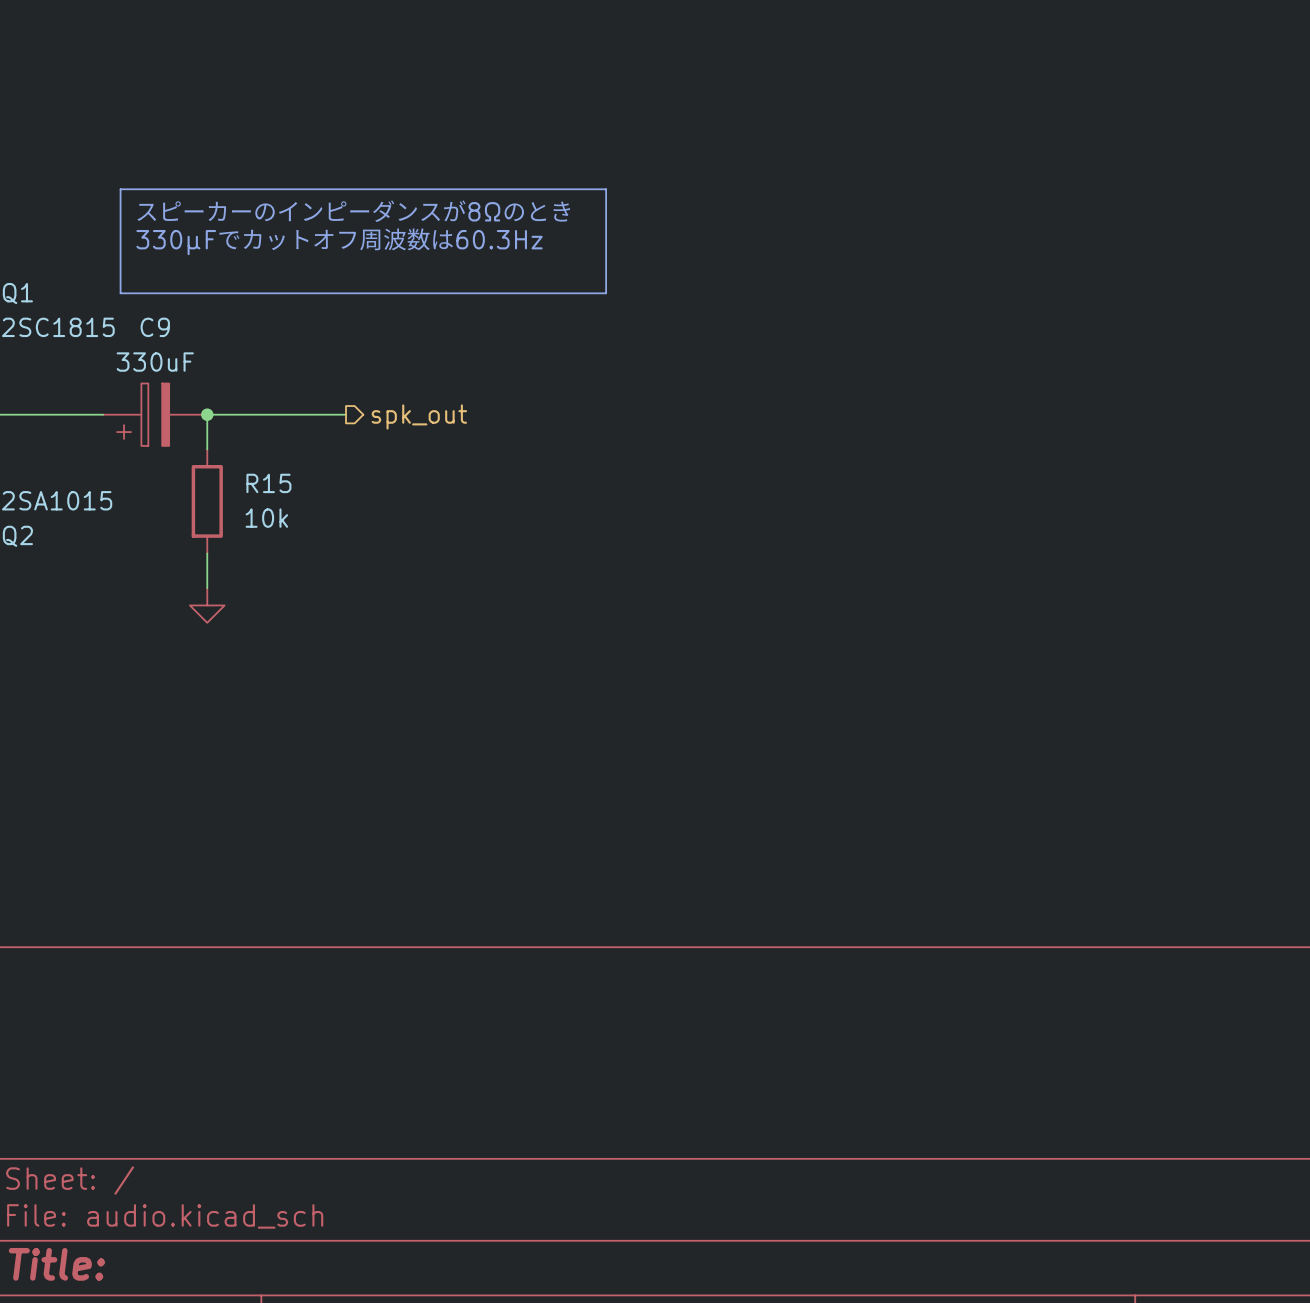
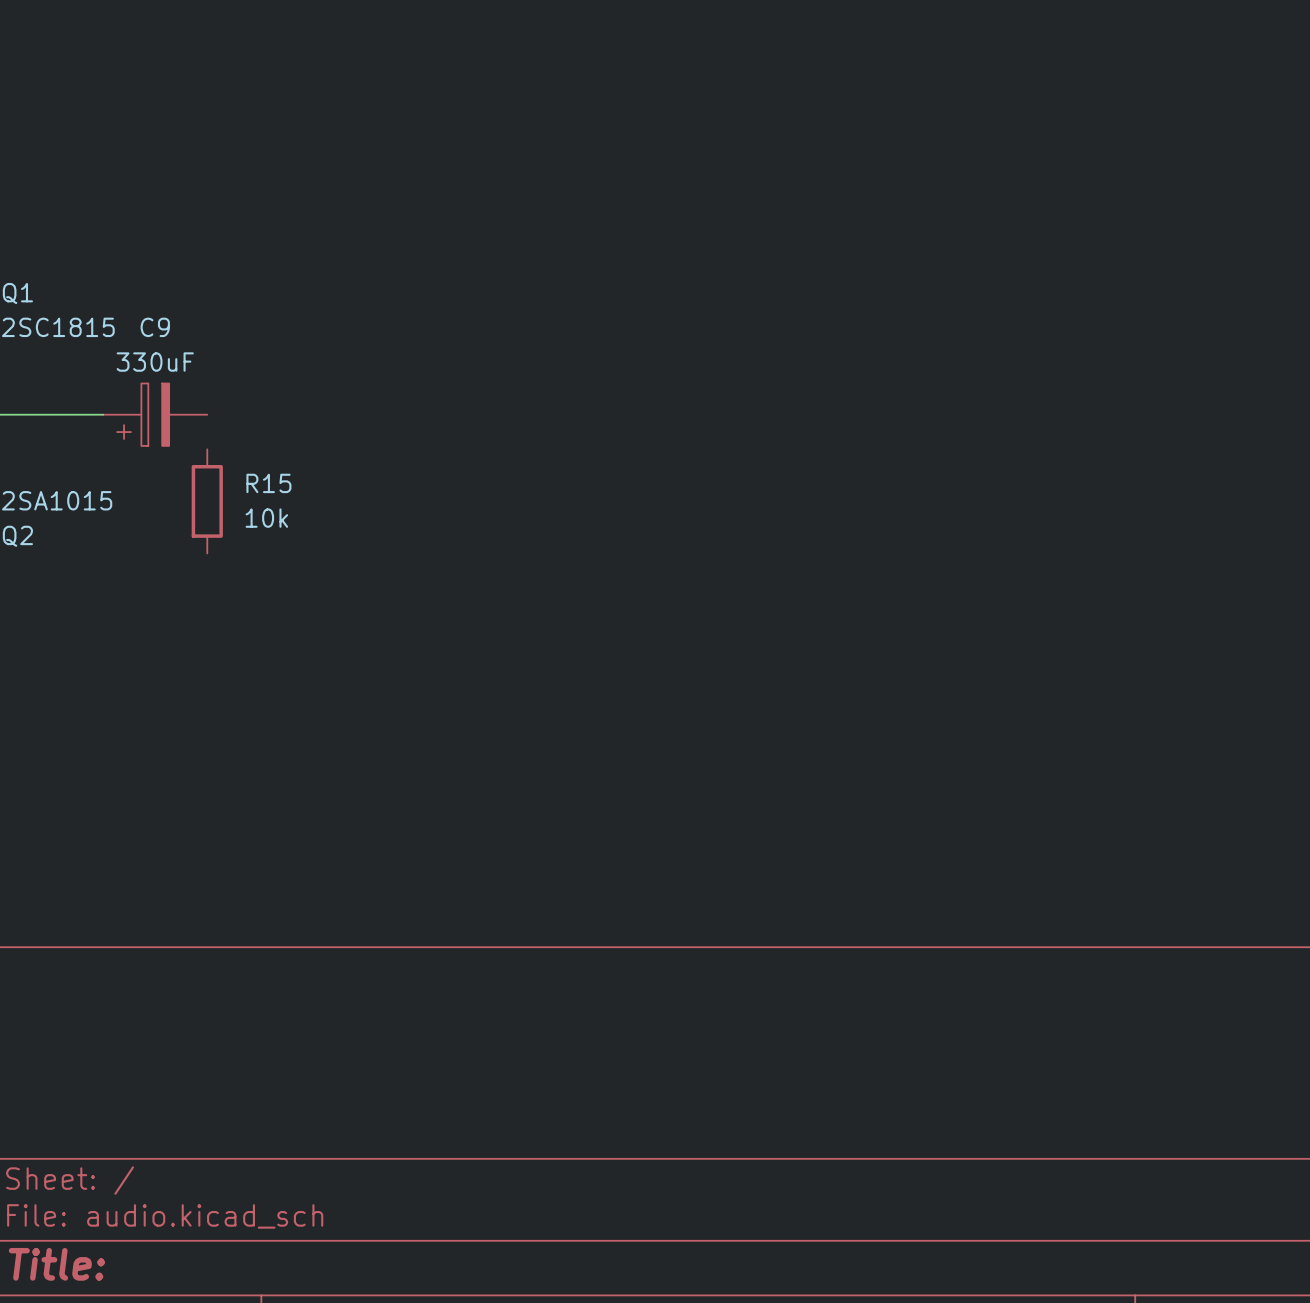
line: (120, 189) (606, 189) (606, 293) (120, 293) (120, 189) -> none
text: スピーカーのインピーダンスが8Ωのとき (353, 211) -> none
text: 330μFでカットオフ周波数は60.3Hz (339, 241) -> none
junction: (207, 414) -> none
wire: (346, 414) (207, 414) (207, 449) -> none
hierarchical label: spk_out (419, 416) -> none
wire: (207, 553) (207, 588) -> none
power symbol: (207, 605) -> none

